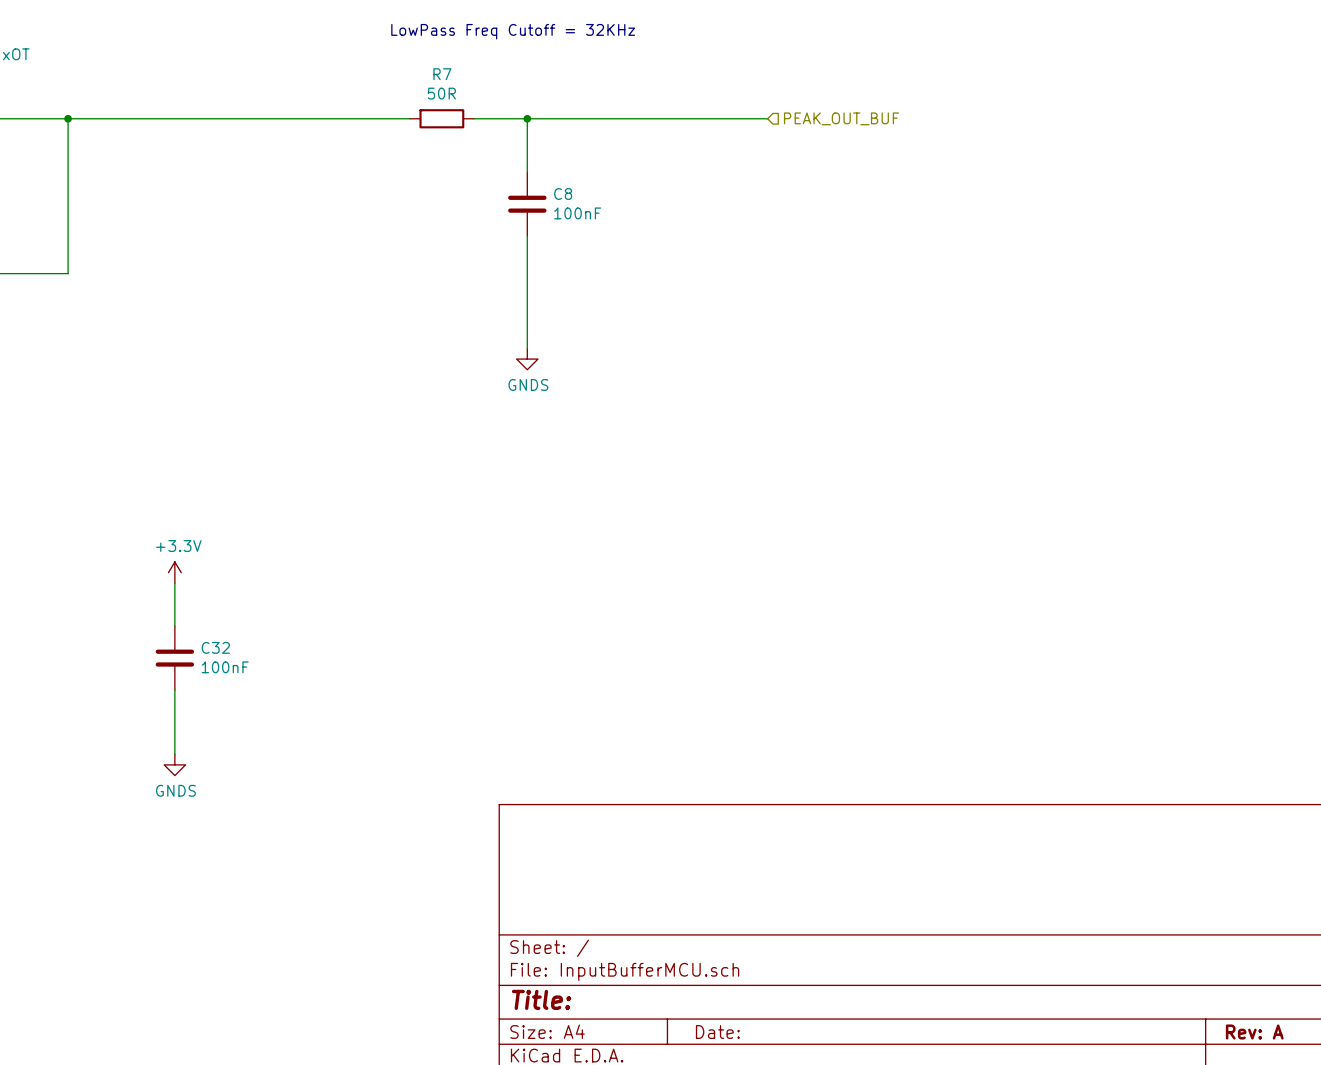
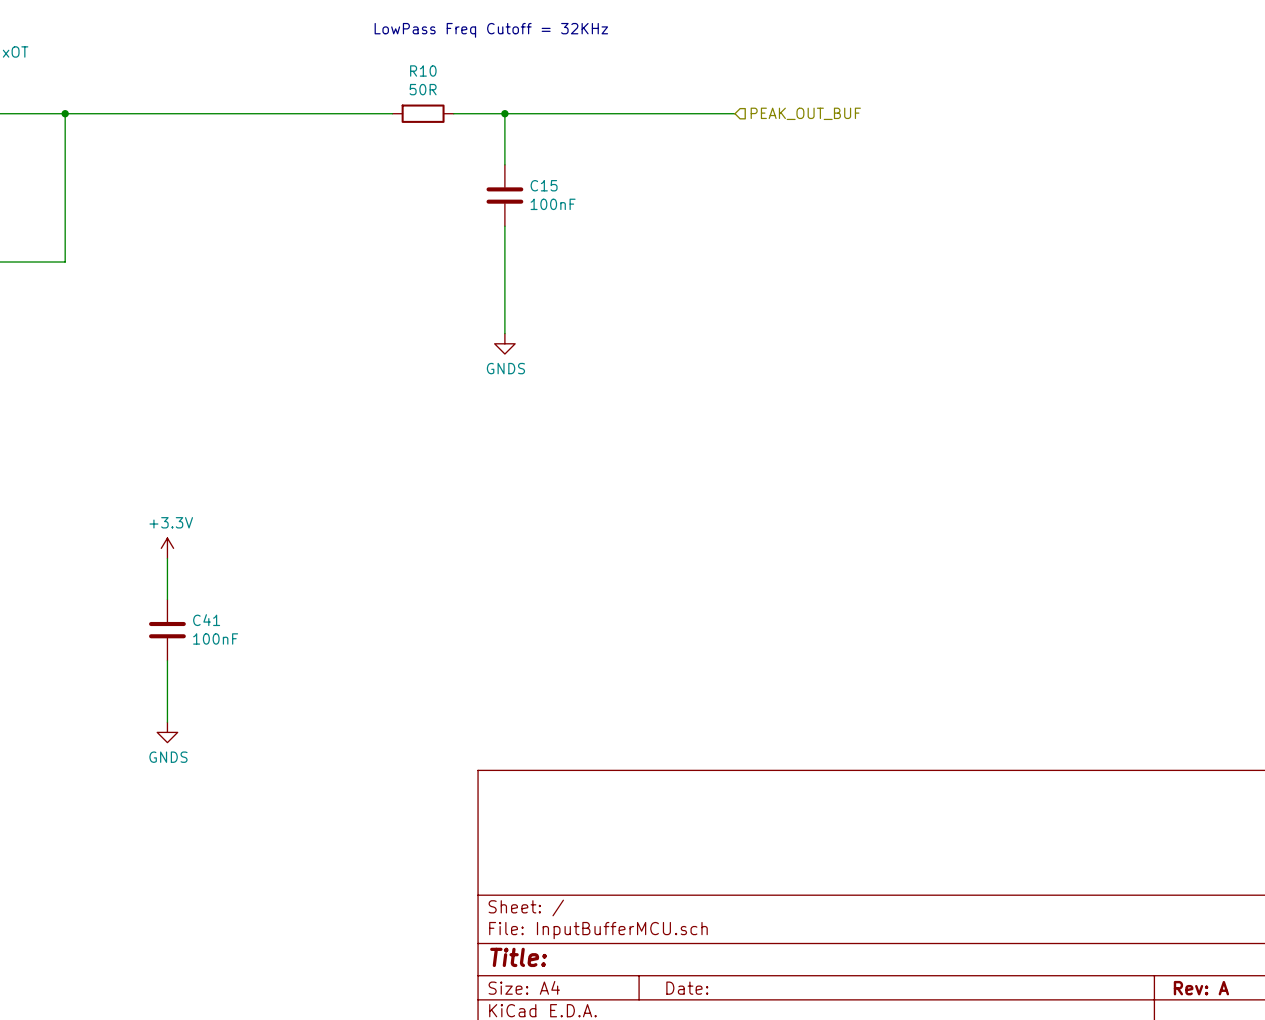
R7 name: R7 (442, 74) -> R10 (423, 71)
C8 name: C8 (563, 193) -> C15 (544, 185)
C32 name: C32 (215, 647) -> C41 (206, 620)

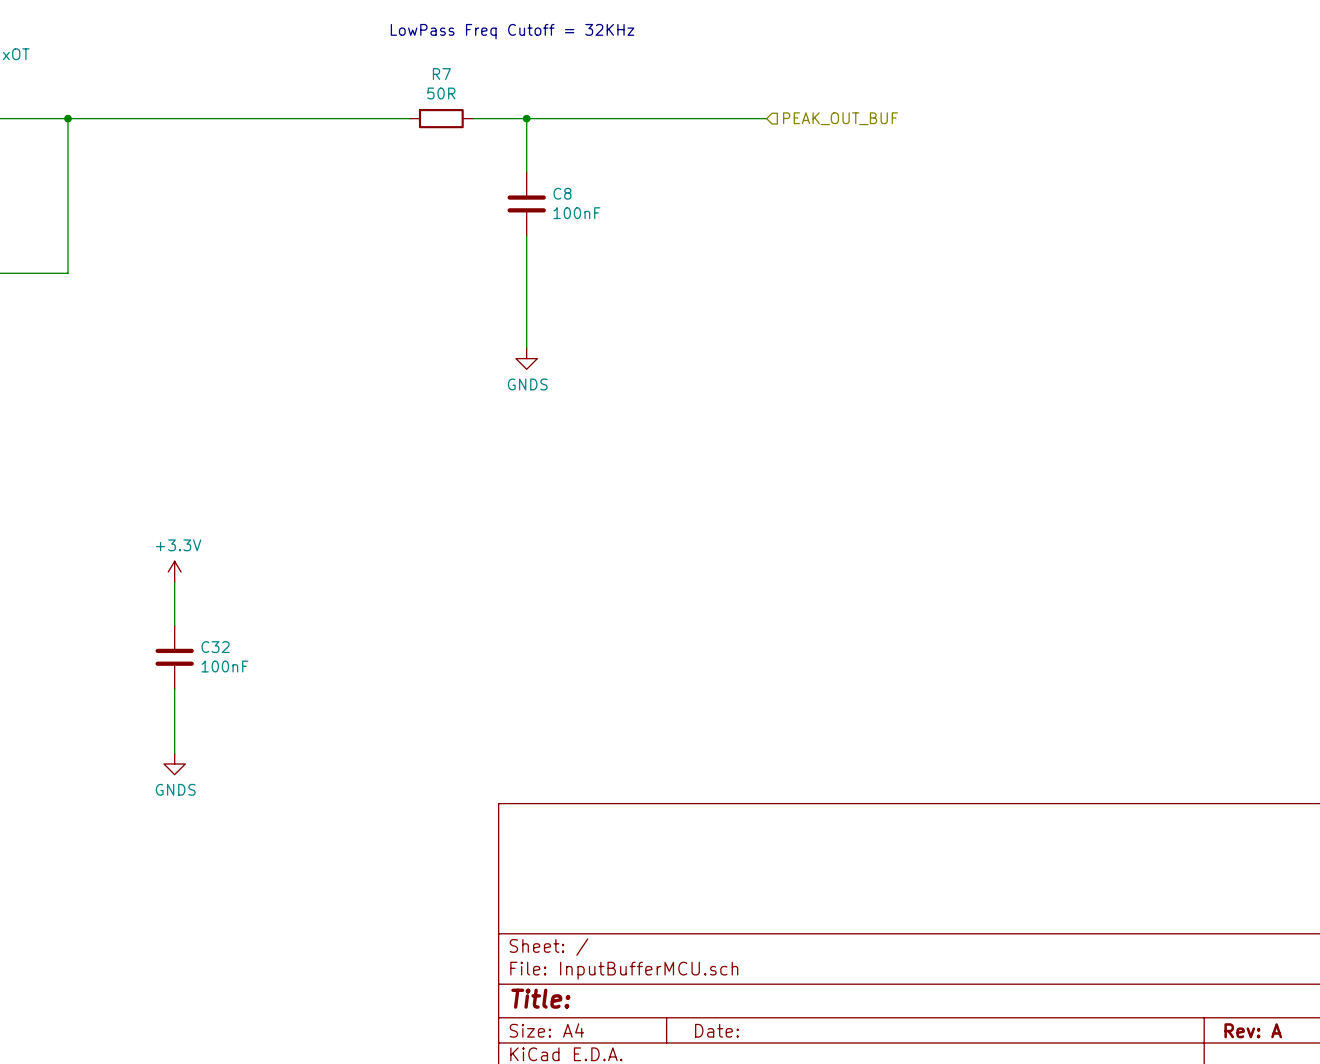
R10 name: R10 (423, 71) -> R7 (441, 74)
C15 name: C15 (544, 185) -> C8 (562, 193)
C41 name: C41 (206, 620) -> C32 (215, 647)

